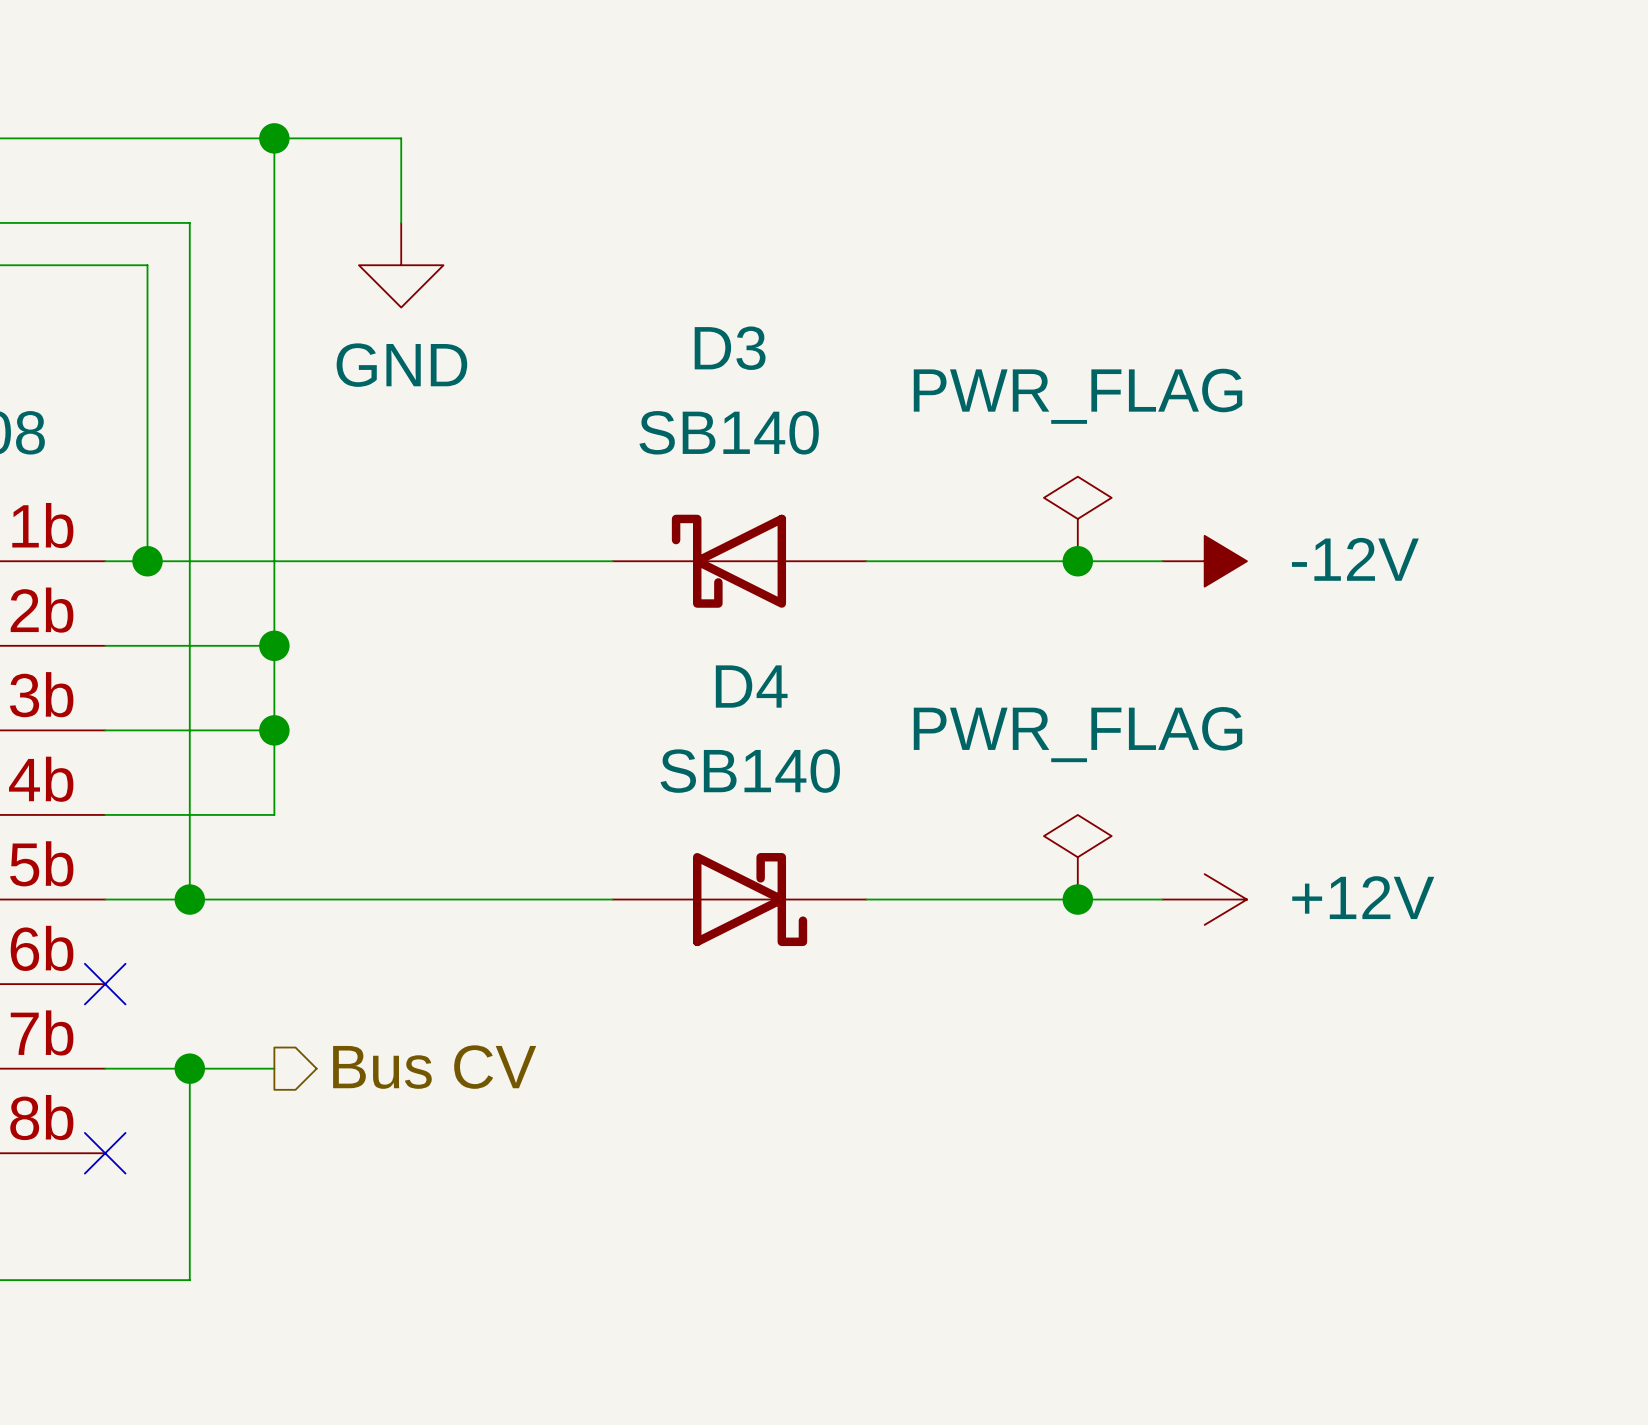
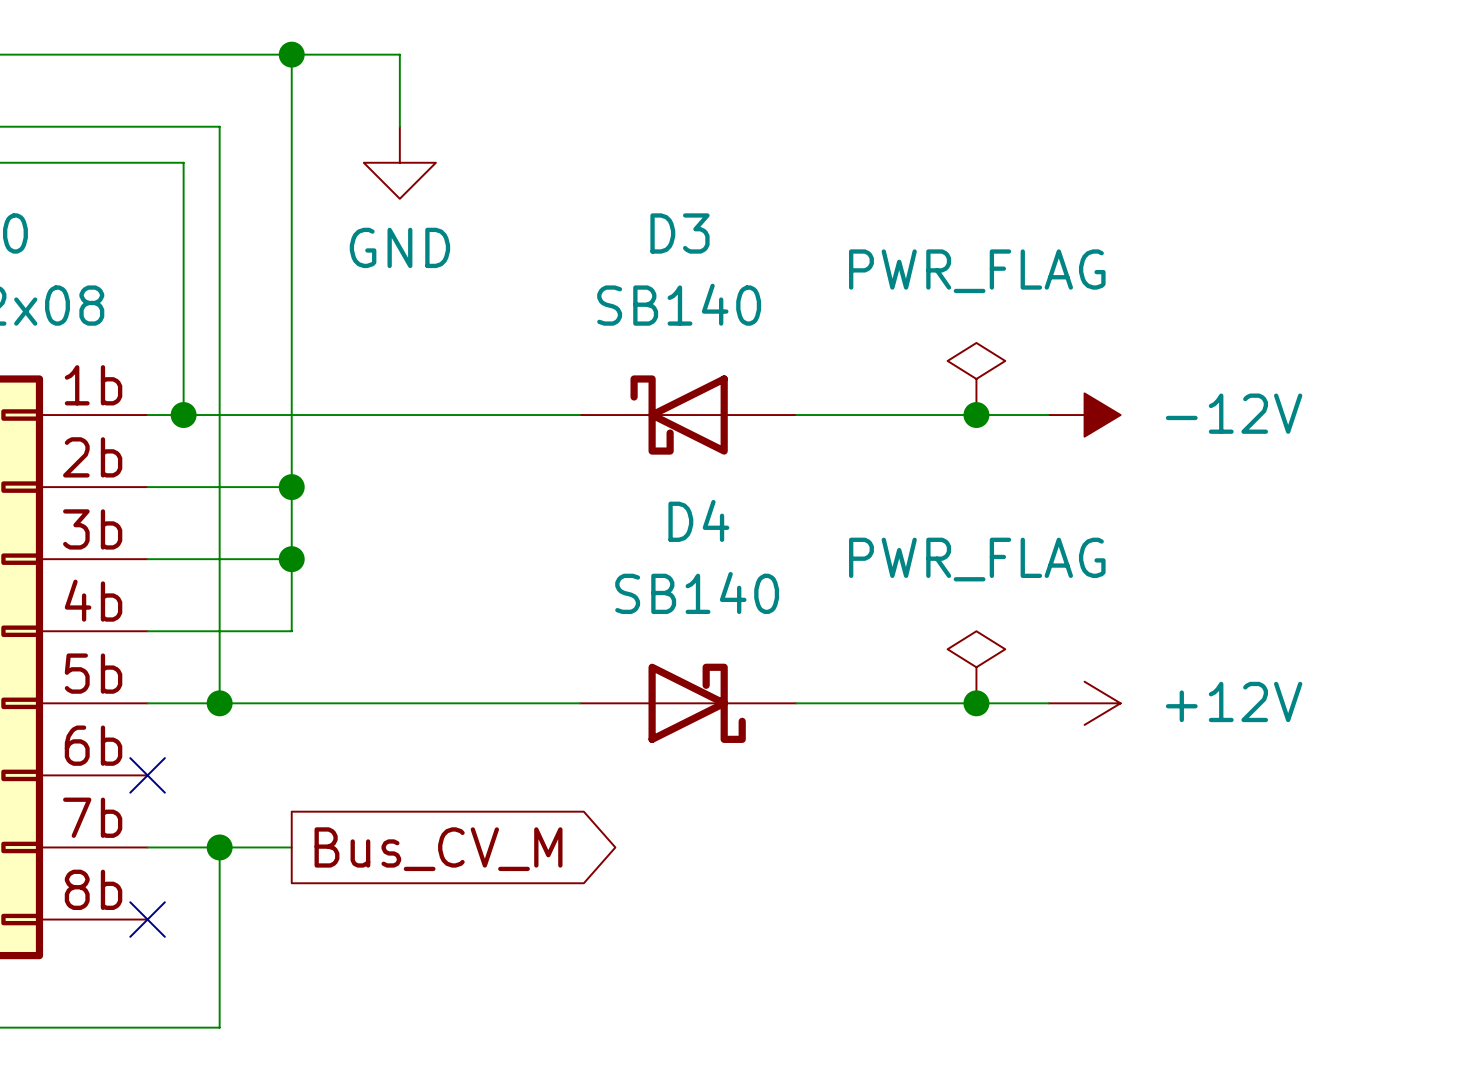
hierarchical label: Bus CV (434, 1067) -> none
global label: none -> Bus_CV_M (438, 849)

